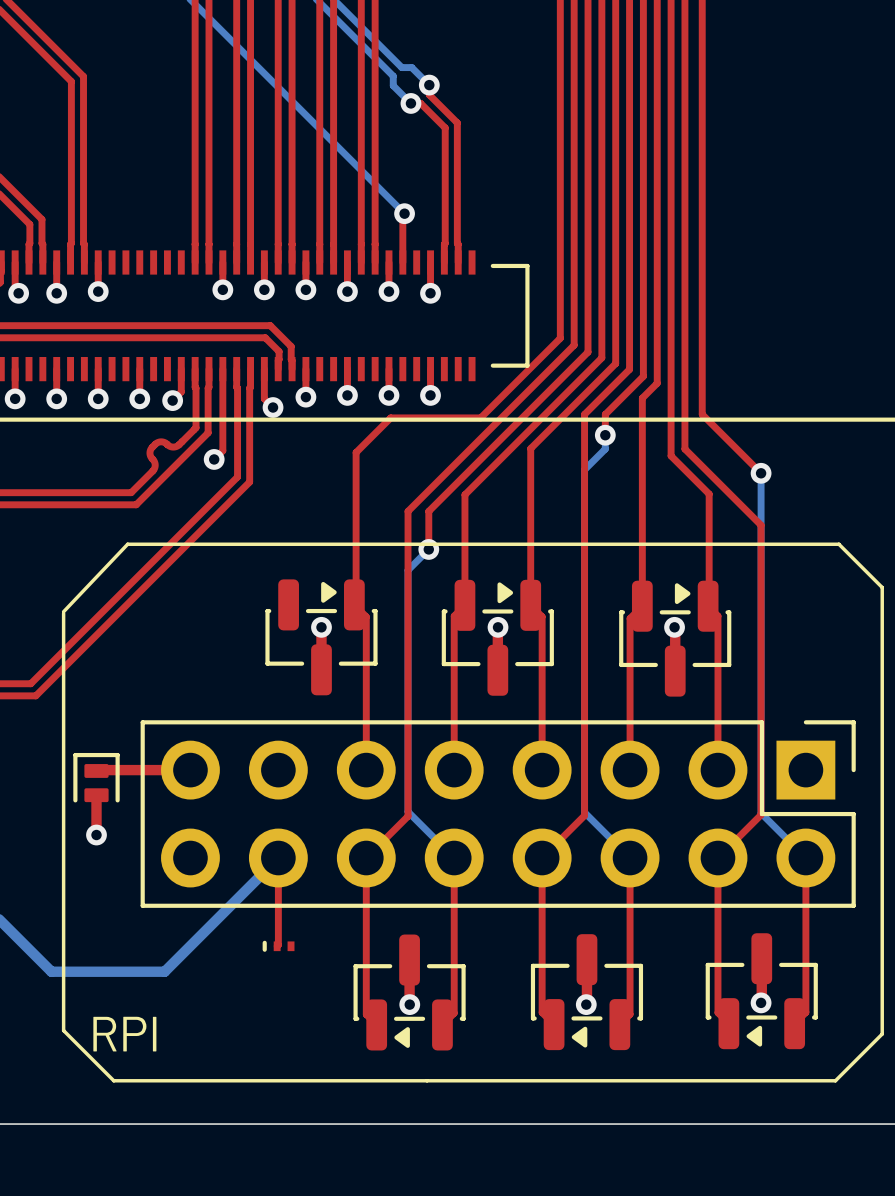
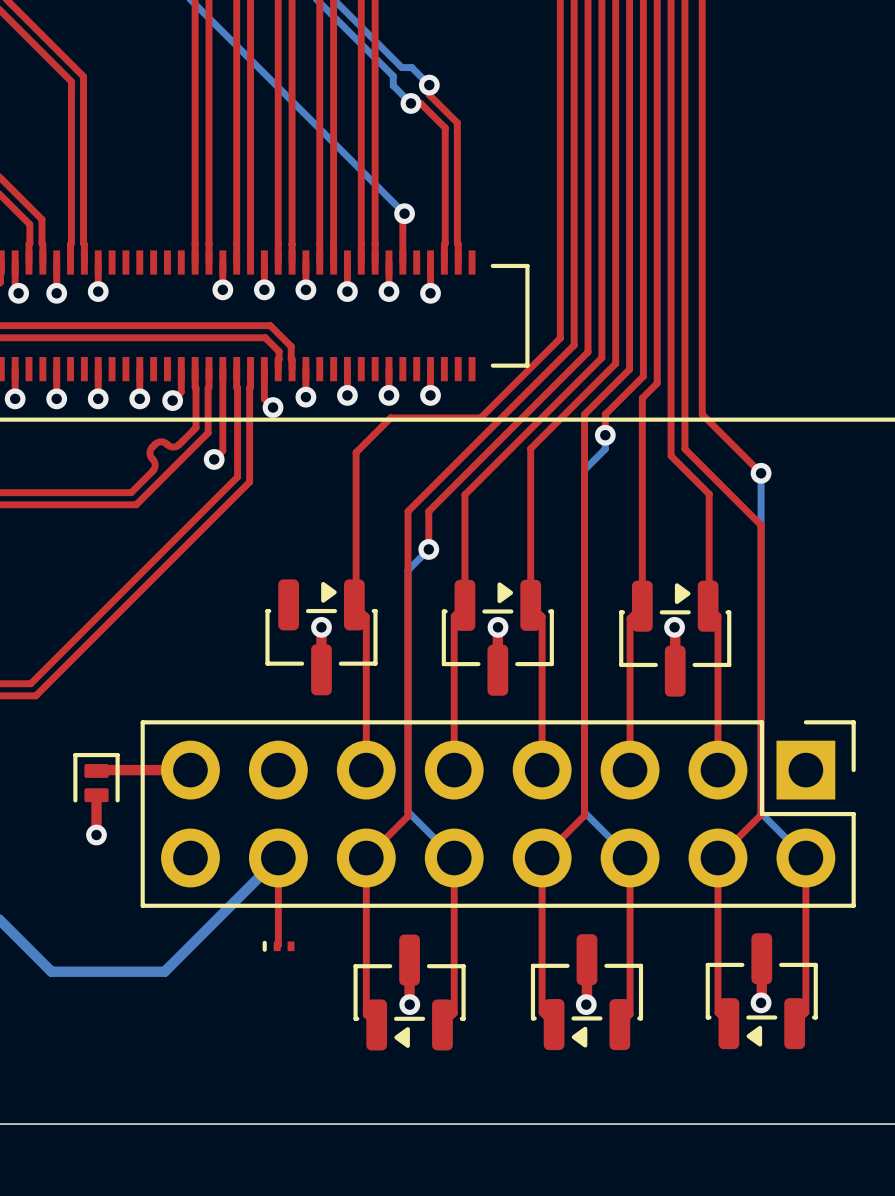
line: (63, 611) (127, 544) (838, 544) (882, 587) (882, 1034) (835, 1080) (113, 1080) (63, 1030) (63, 613) -> none
text: RPI (124, 1034) -> none

